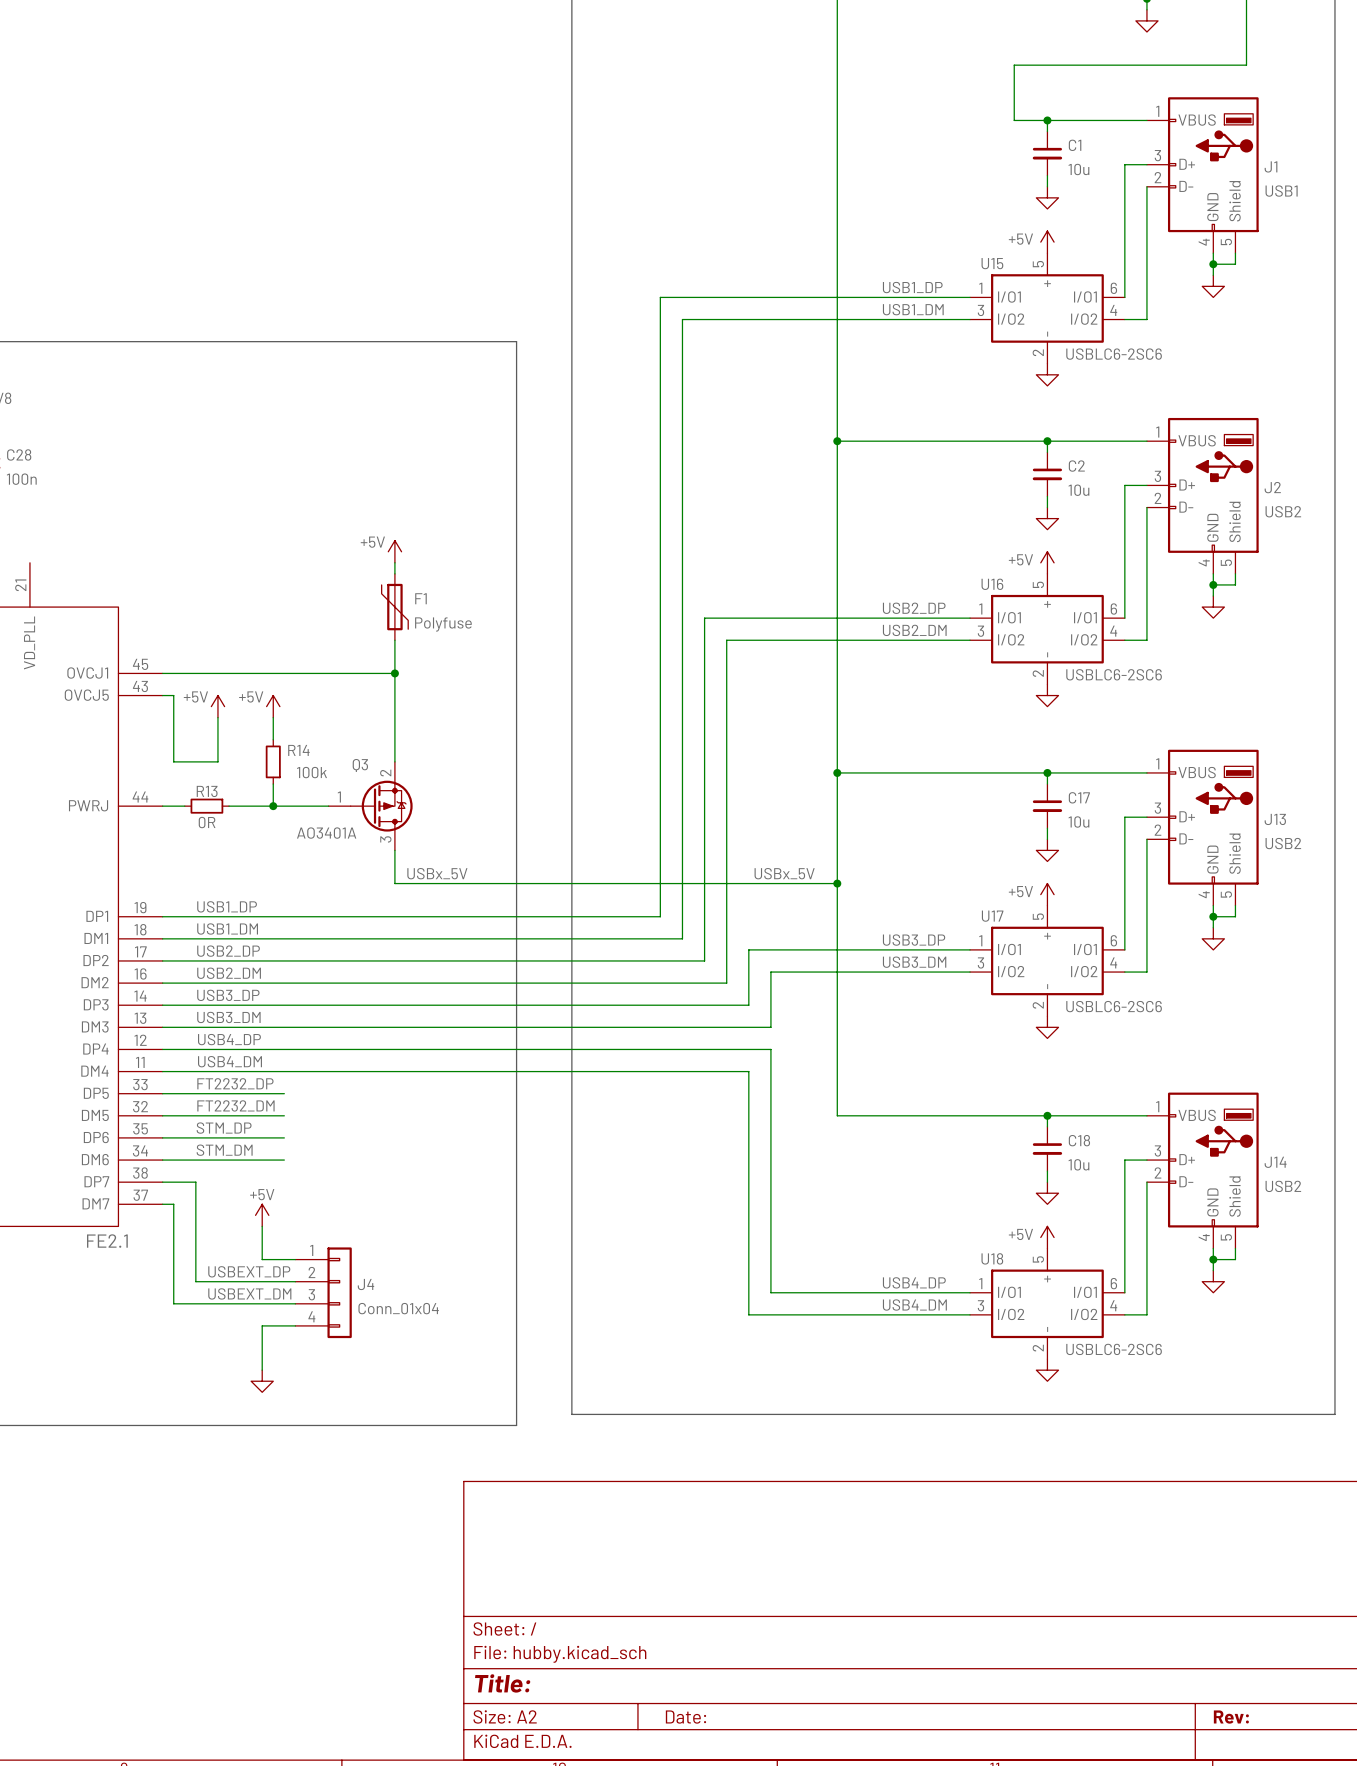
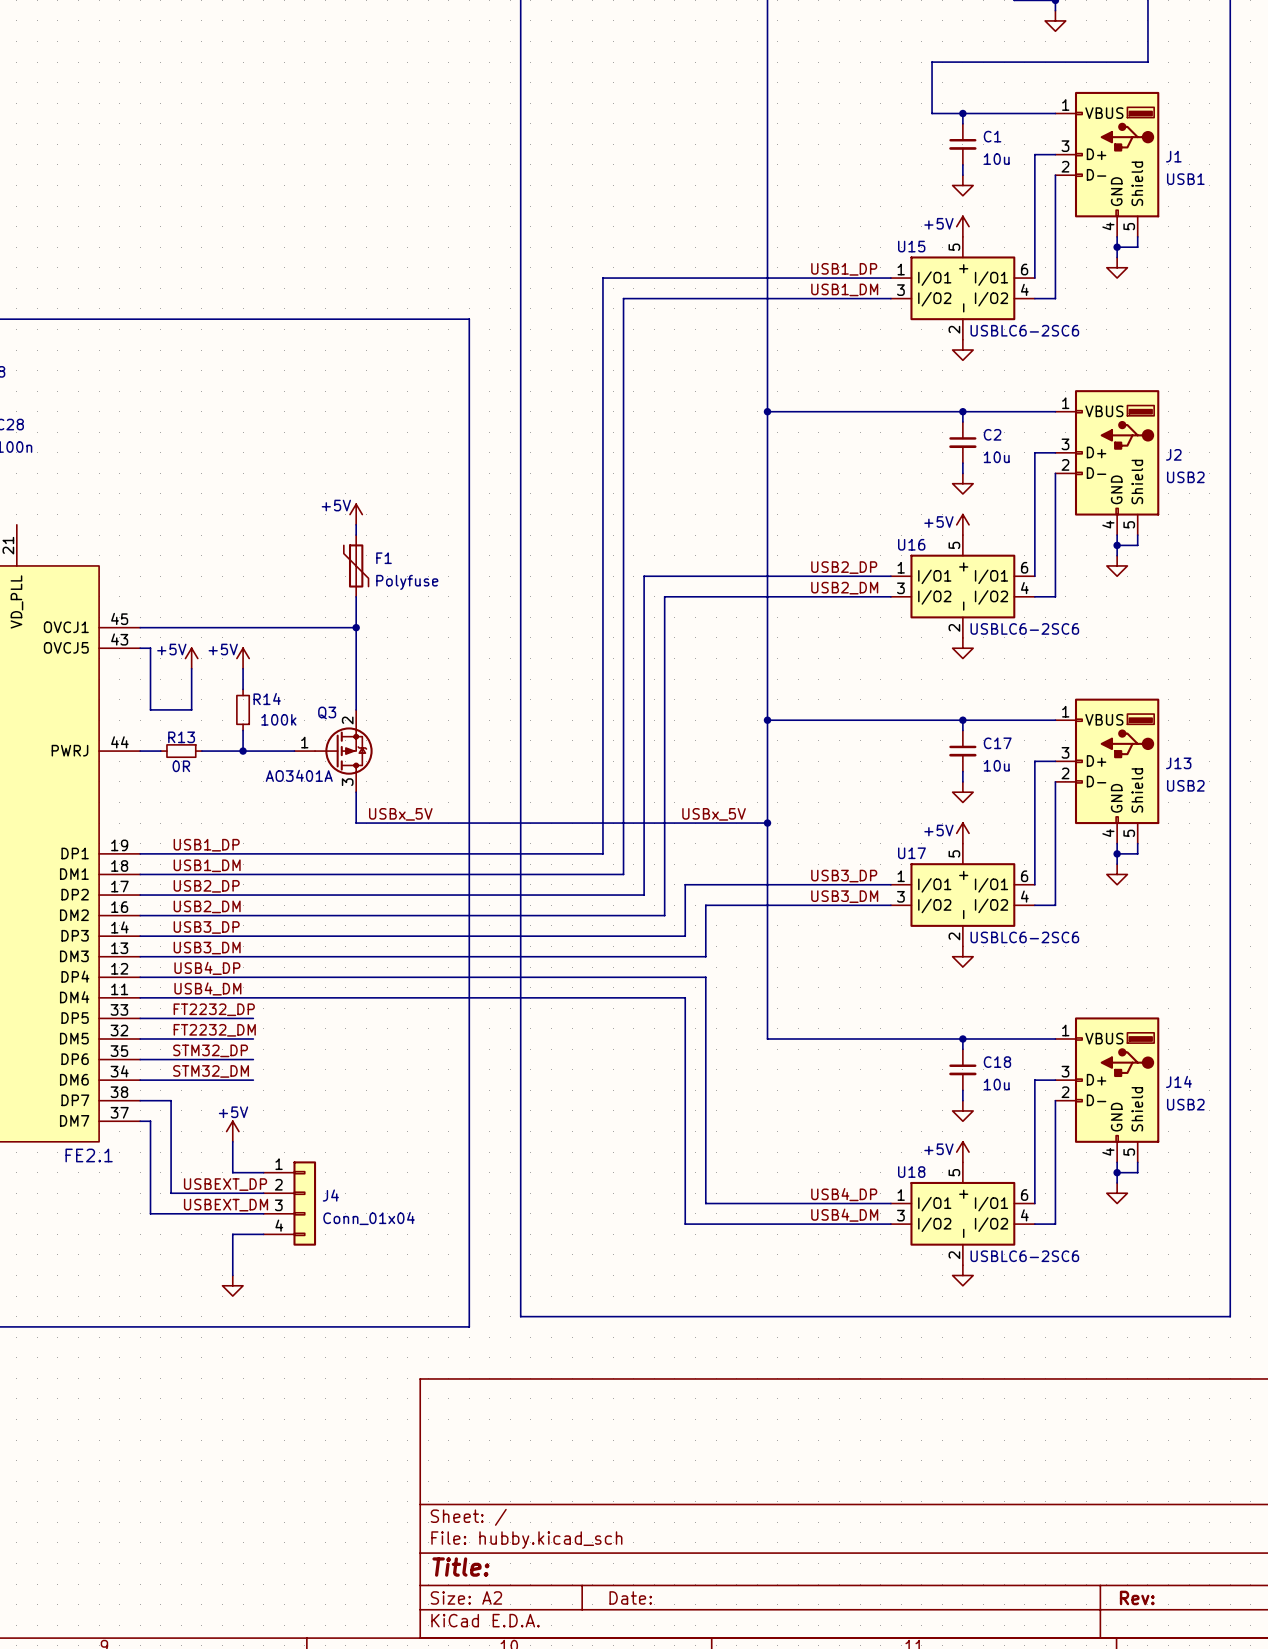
label: STM_DP (224, 1128) -> STM32_DP (210, 1050)
label: STM_DM (224, 1150) -> STM32_DM (211, 1071)

